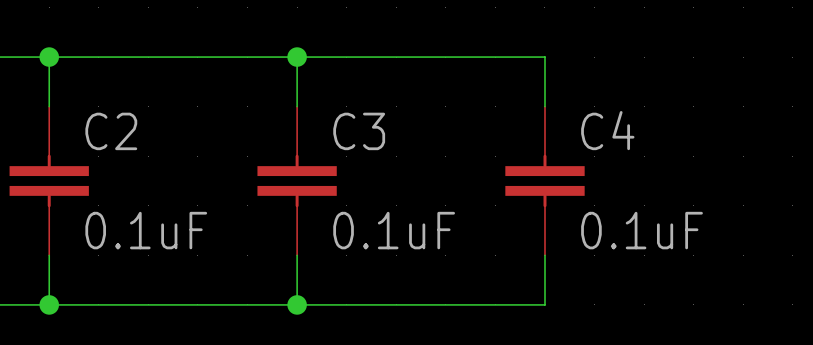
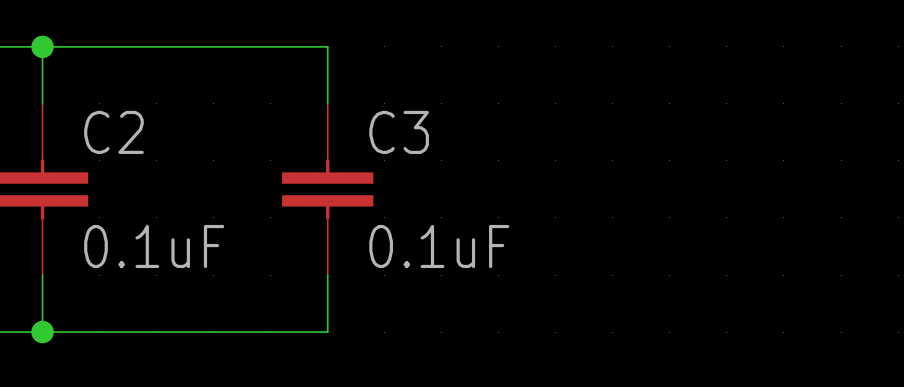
wire: (297, 57) (544, 57) (544, 106) -> none
junction: (297, 57) -> none
C4: 0.1uF (544, 180) -> none
wire: (544, 255) (544, 304) (297, 304) -> none
junction: (297, 304) -> none

